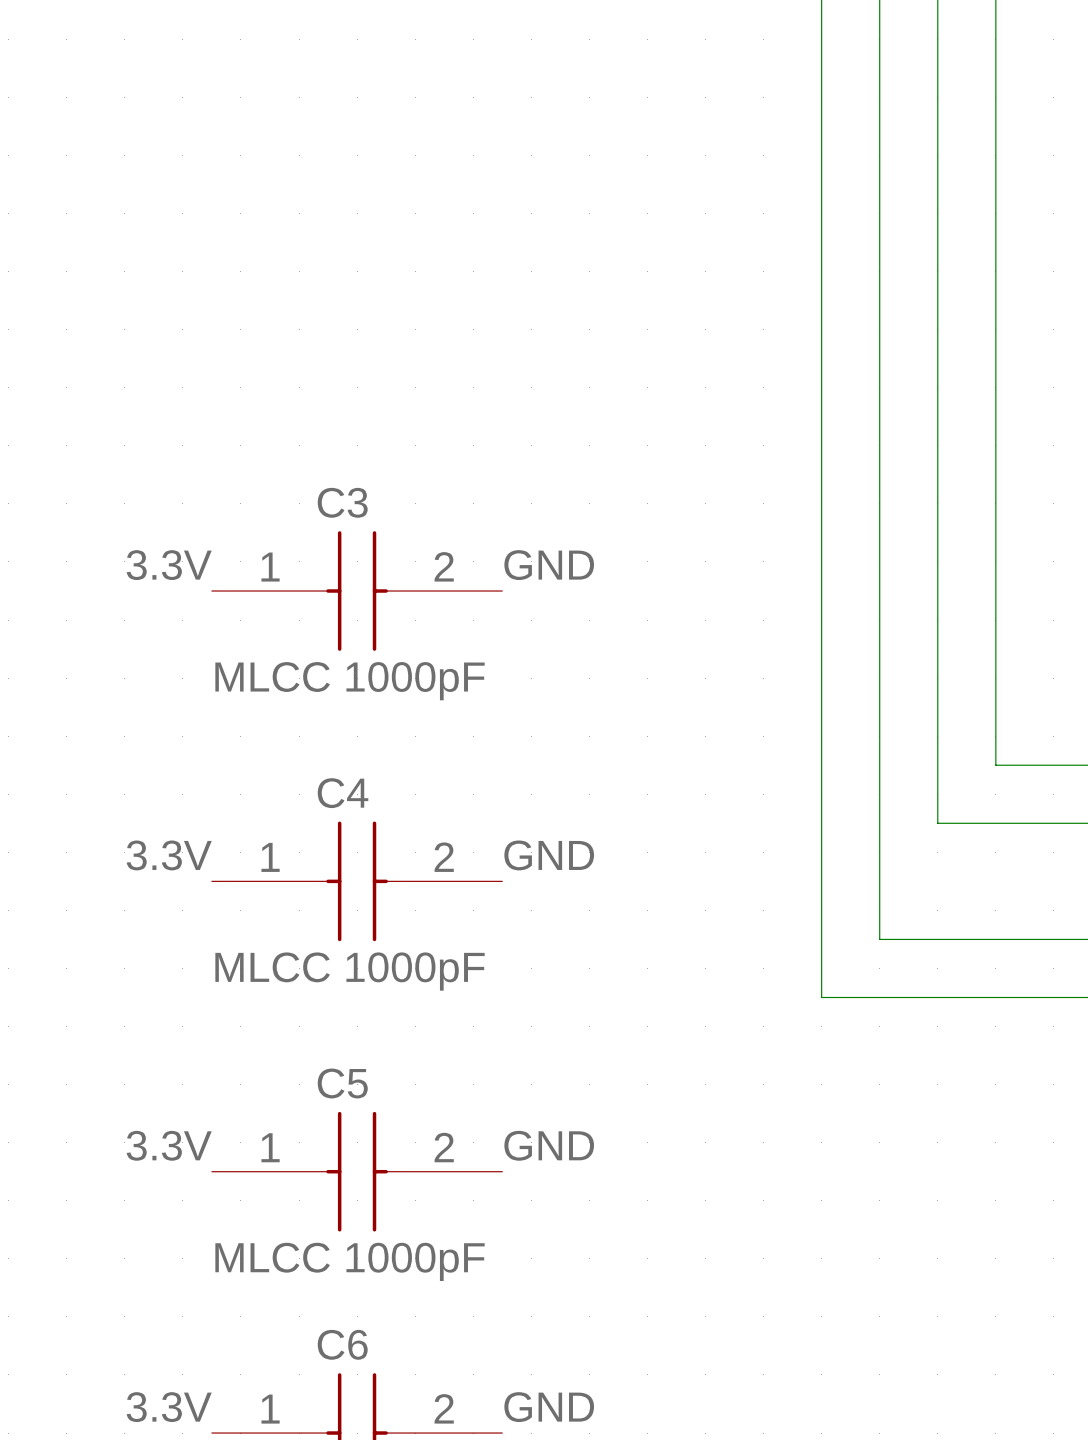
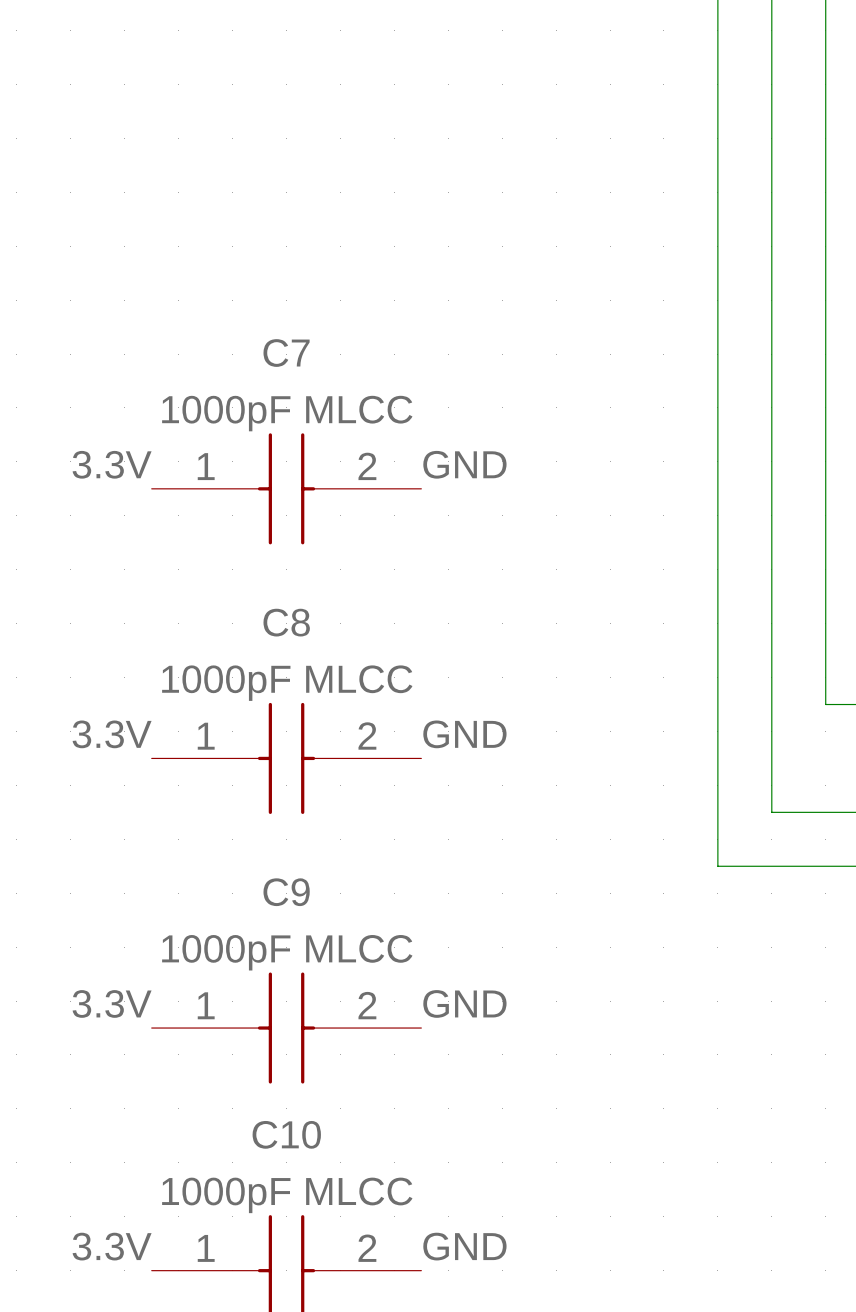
C3 name: C3 (342, 502) -> C7 (286, 353)
C3 value: none -> 1000pF MLCC (287, 413)
C3 text: MLCC 1000pF (350, 681) -> none
C4 name: C4 (343, 793) -> C8 (286, 622)
C4 value: none -> 1000pF MLCC (287, 683)
C4 text: MLCC 1000pF (350, 971) -> none
C5 name: C5 (342, 1083) -> C9 (286, 892)
C5 value: none -> 1000pF MLCC (287, 952)
C5 text: MLCC 1000pF (350, 1261) -> none
C6 name: C6 (342, 1344) -> C10 (286, 1134)
C6 value: none -> 1000pF MLCC (287, 1195)

